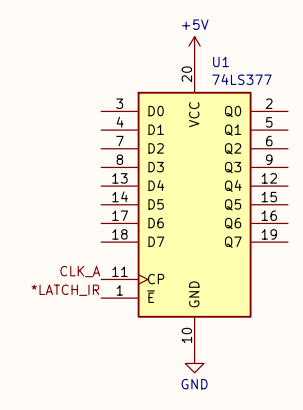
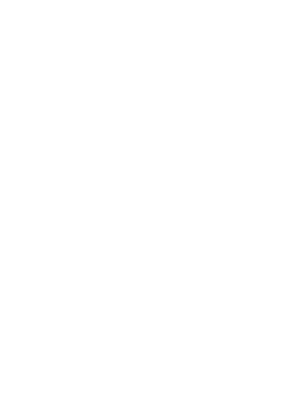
power symbol: +5V (194, 46) -> none
U1: 74LS377 (194, 204) -> none
label: CLK_A (80, 271) -> none
label: *LATCH_IR (65, 290) -> none
power symbol: GND (194, 363) -> none

